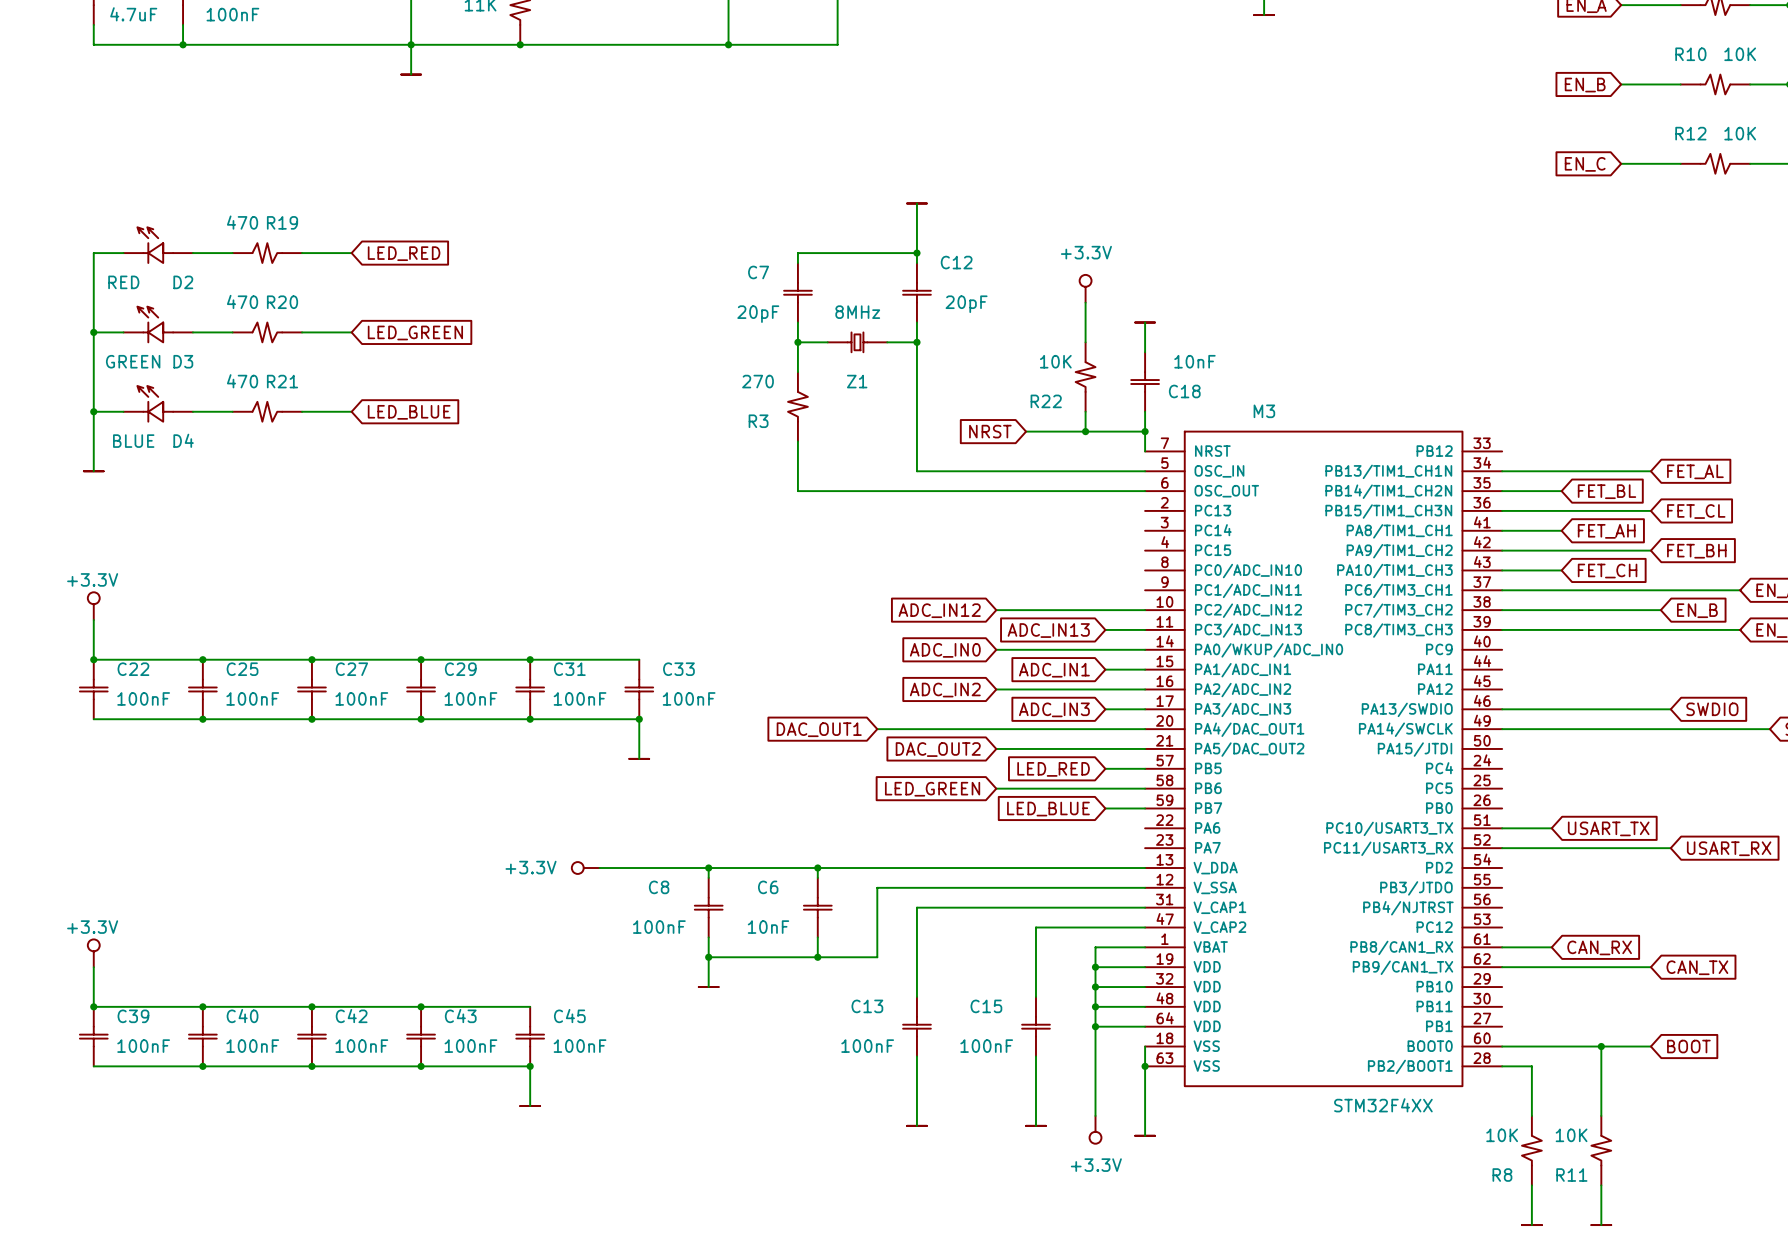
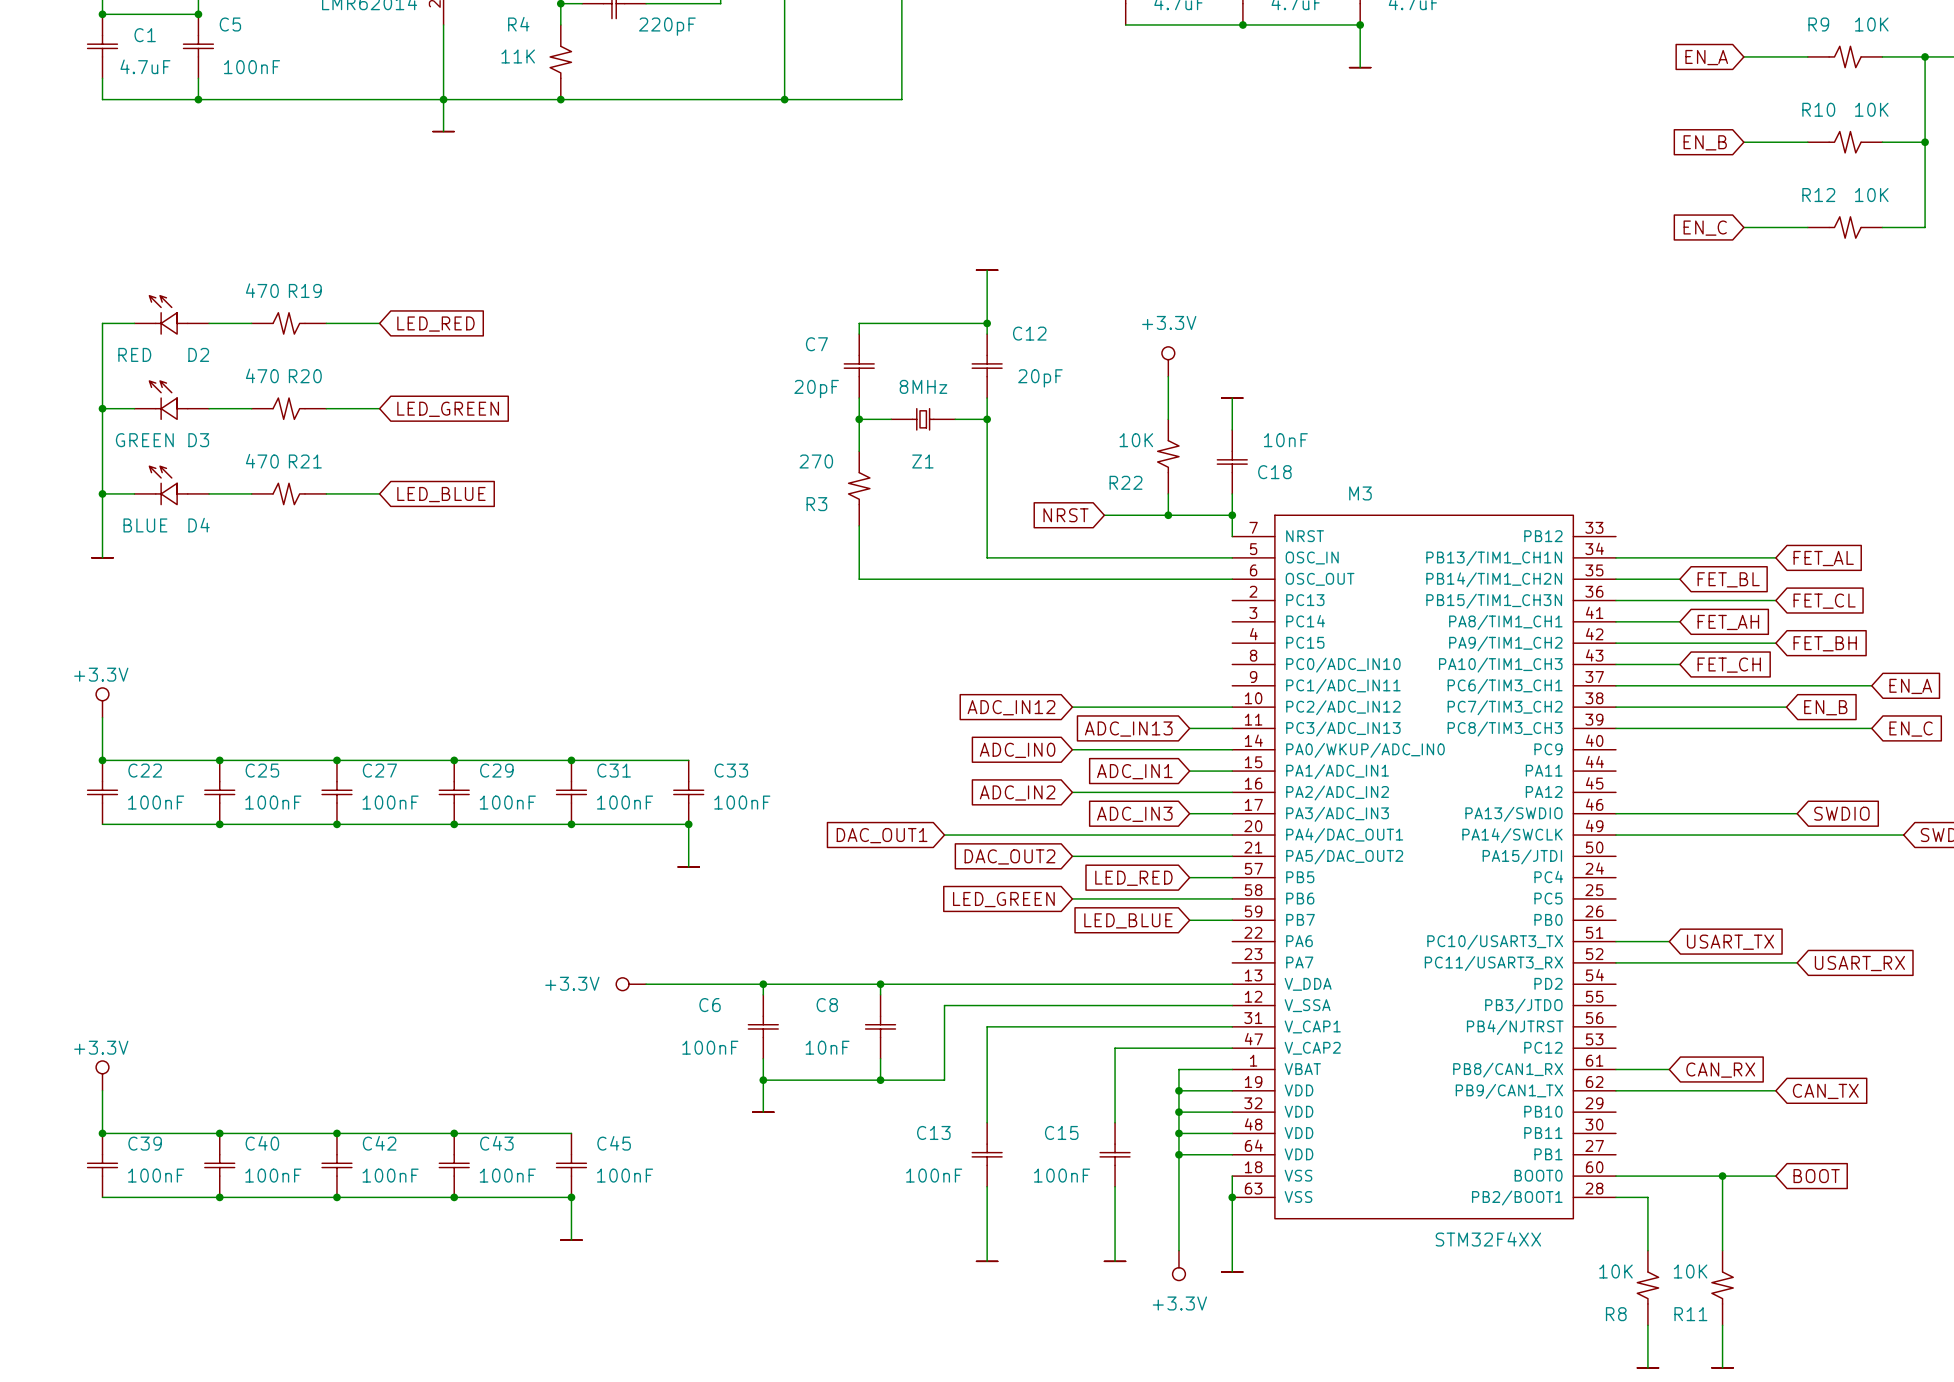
C8 name: C8 (659, 887) -> C6 (710, 1005)
C6 name: C6 (768, 887) -> C8 (827, 1005)

